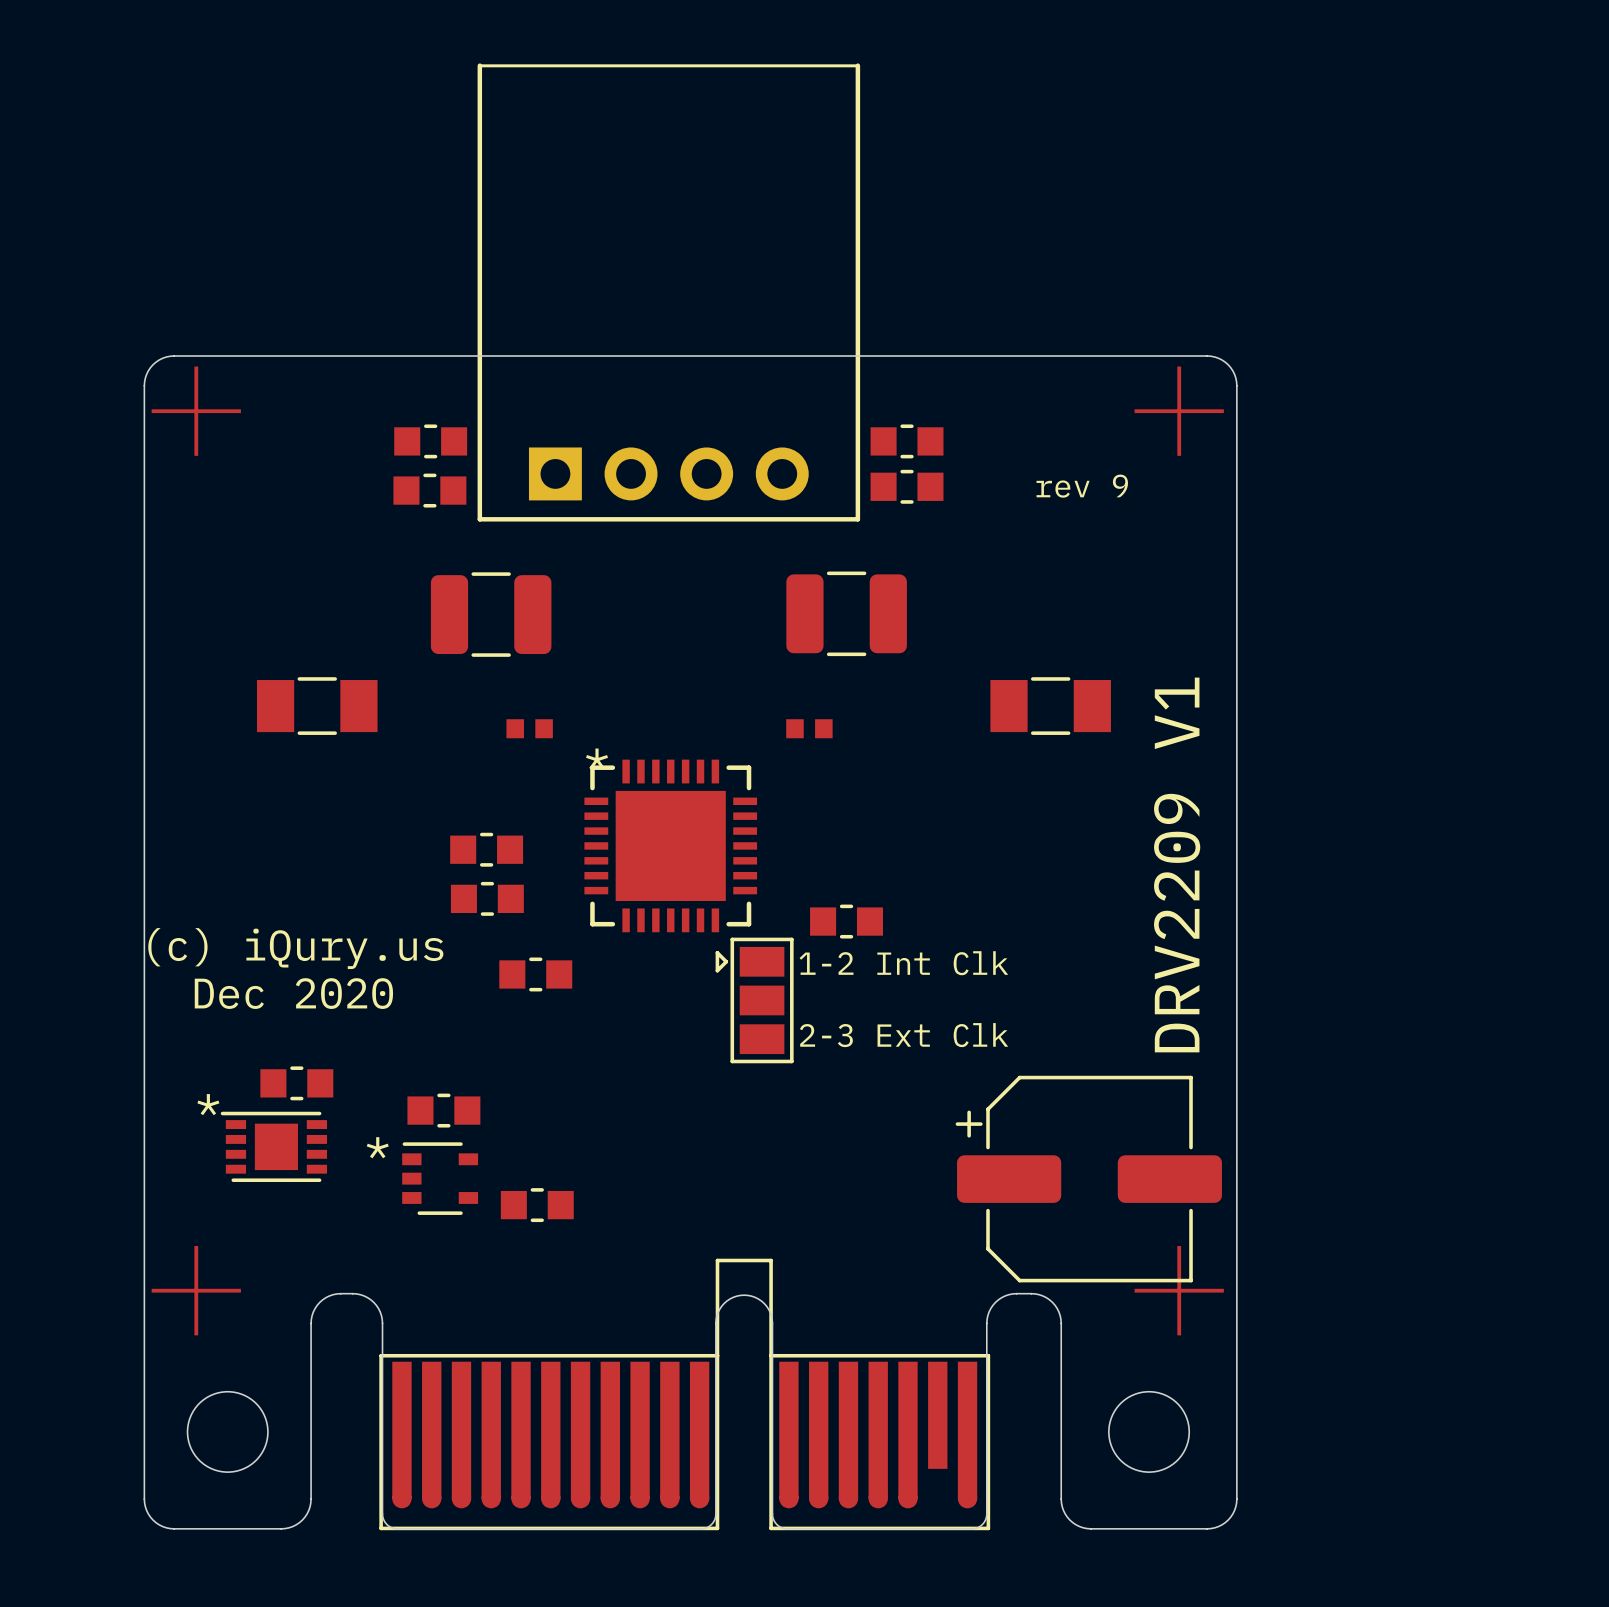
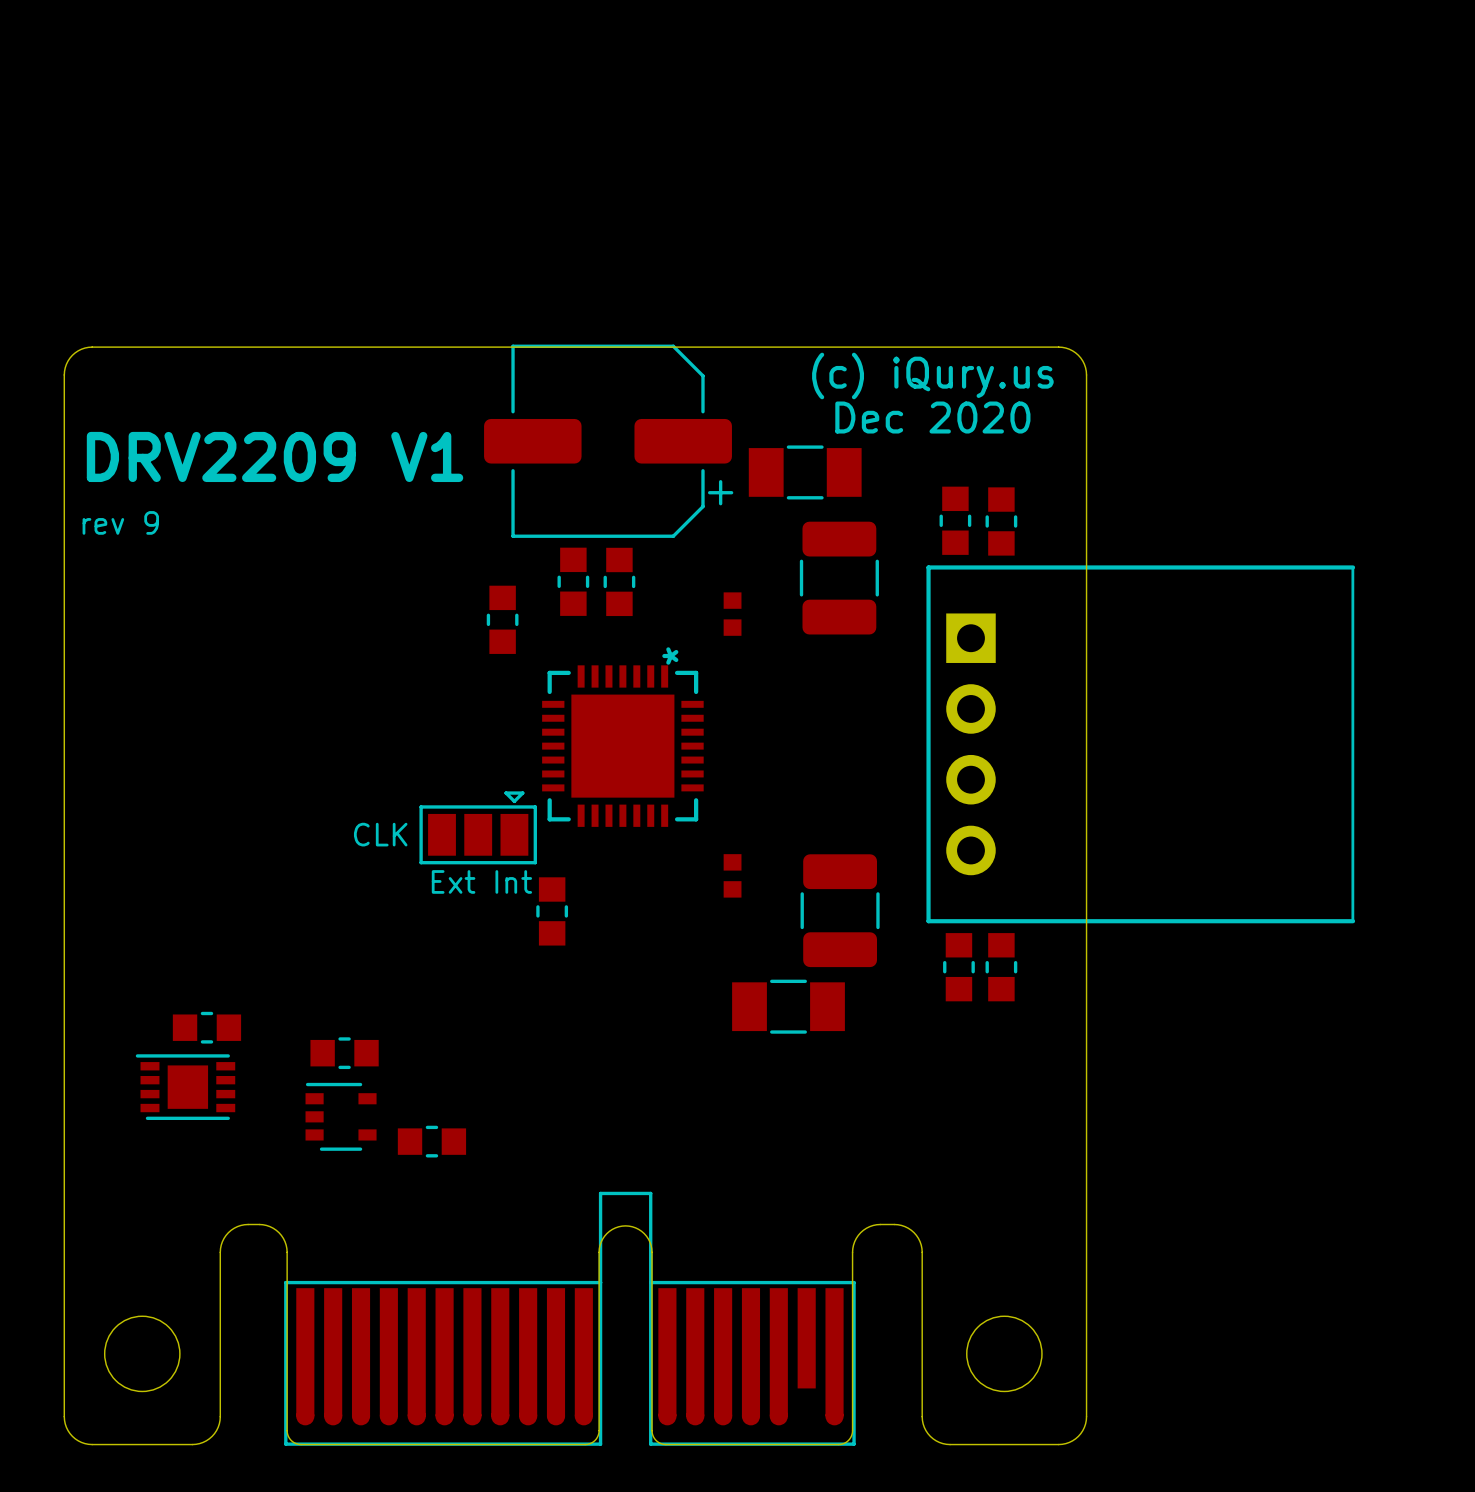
part: (668, 292) -> none
text: none -> (c) iQury.us (932, 375)
part: (196, 411) -> none
part: (1179, 411) -> none
text: none -> Dec 2020 (932, 417)
part: (430, 441) -> none
part: (907, 441) -> none
part: none -> (608, 441)
text: none -> DRV2209 V1 (275, 456)
part: (907, 486) -> none
text: rev 9 (1082, 486) -> none
part: none -> (805, 472)
part: (429, 490) -> none
part: none -> (955, 520)
part: none -> (1001, 521)
text: none -> rev 9 (120, 522)
part: none -> (573, 581)
part: none -> (619, 581)
part rotation: 0° (846, 613) -> 90° clockwise (839, 578)
part position: (846, 613) -> (839, 578)
part: (491, 614) -> none
part: none -> (502, 619)
part: (317, 706) -> none
part: (1050, 706) -> none
part: (529, 728) -> none
part rotation: 0° (809, 728) -> 90° clockwise (732, 614)
part position: (809, 728) -> (732, 614)
part: none -> (1140, 744)
part: none -> (622, 746)
part: (670, 845) -> none
part: (486, 849) -> none
text: DRV2209 V1 (1177, 864) -> none
text: none -> CLK (380, 834)
part: (487, 898) -> none
part footprint: [810, 904, 884, 939] -> [723, 854, 742, 898]
text: none -> Ext Int (481, 881)
text: (c) iQury.us (295, 948) -> none
part: none -> (840, 910)
part: none -> (552, 911)
text: 1-2 Int Clk (903, 963) -> none
part: (535, 974) -> none
text: Dec 2020 (293, 993) -> none
part rotation: 0° (754, 1000) -> 90° clockwise (478, 827)
part position: (754, 1000) -> (478, 827)
part: none -> (958, 967)
part: none -> (1001, 967)
text: 2-3 Ext Clk (904, 1035) -> none
part: none -> (788, 1006)
text: * (208, 1104) -> none
text: * (377, 1147) -> none
part: (1088, 1179) -> none
part: (196, 1290) -> none
part: (1179, 1290) -> none

